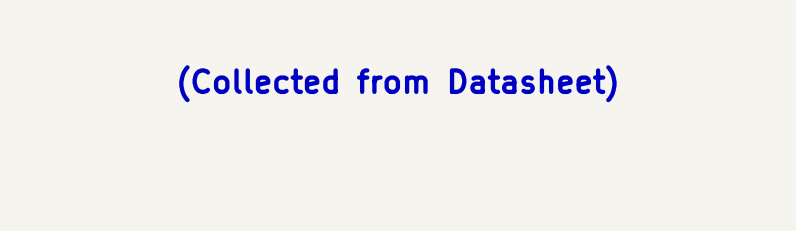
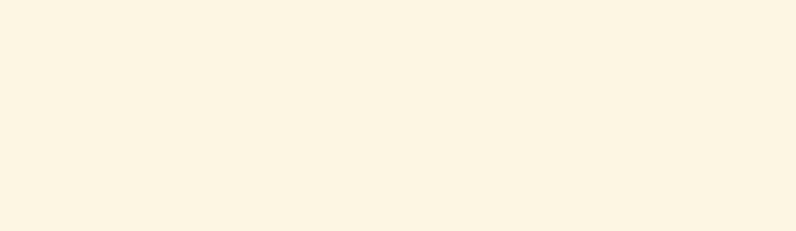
text: (Collected from Datasheet) (397, 83) -> none

